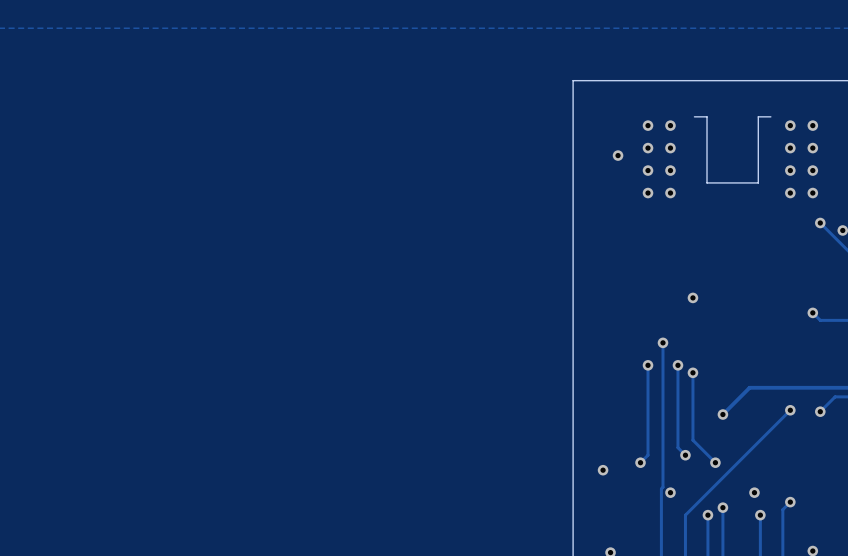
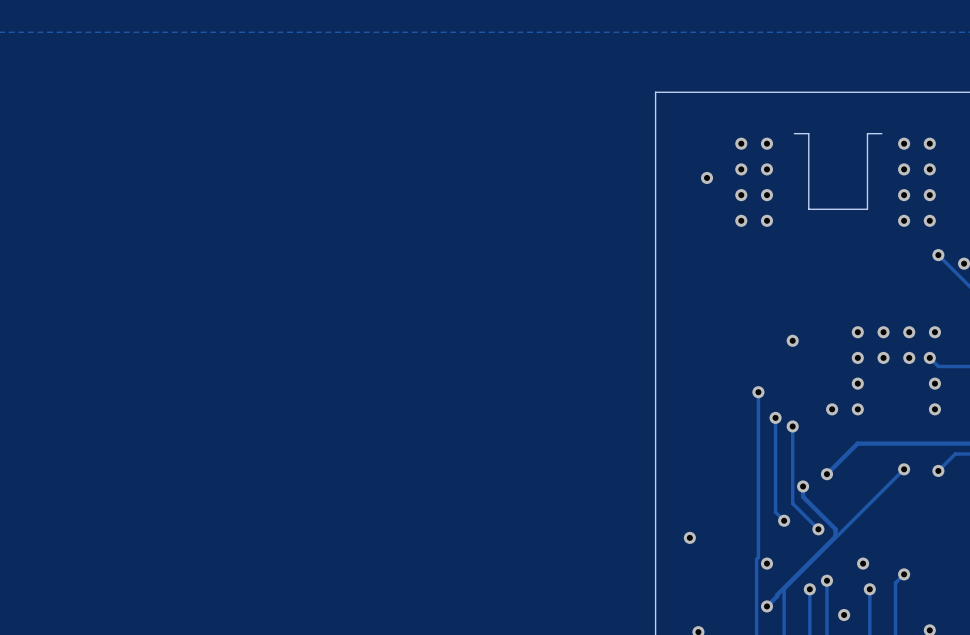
via: none -> (857, 332)
via: none -> (883, 332)
via: none -> (909, 332)
via: none -> (934, 332)
via: none -> (857, 357)
via: none -> (883, 357)
via: none -> (909, 357)
via: none -> (857, 383)
via: none -> (934, 383)
via: none -> (832, 409)
via: none -> (857, 409)
via: none -> (934, 409)
track: (648, 365) (648, 455) (640, 462) -> none
via: (648, 365) -> none
track: none -> (803, 486) (803, 496) (835, 529) (835, 536) (766, 606)
via: none -> (803, 486)
via: (640, 462) -> none
via: none -> (766, 606)
via: none -> (844, 615)

